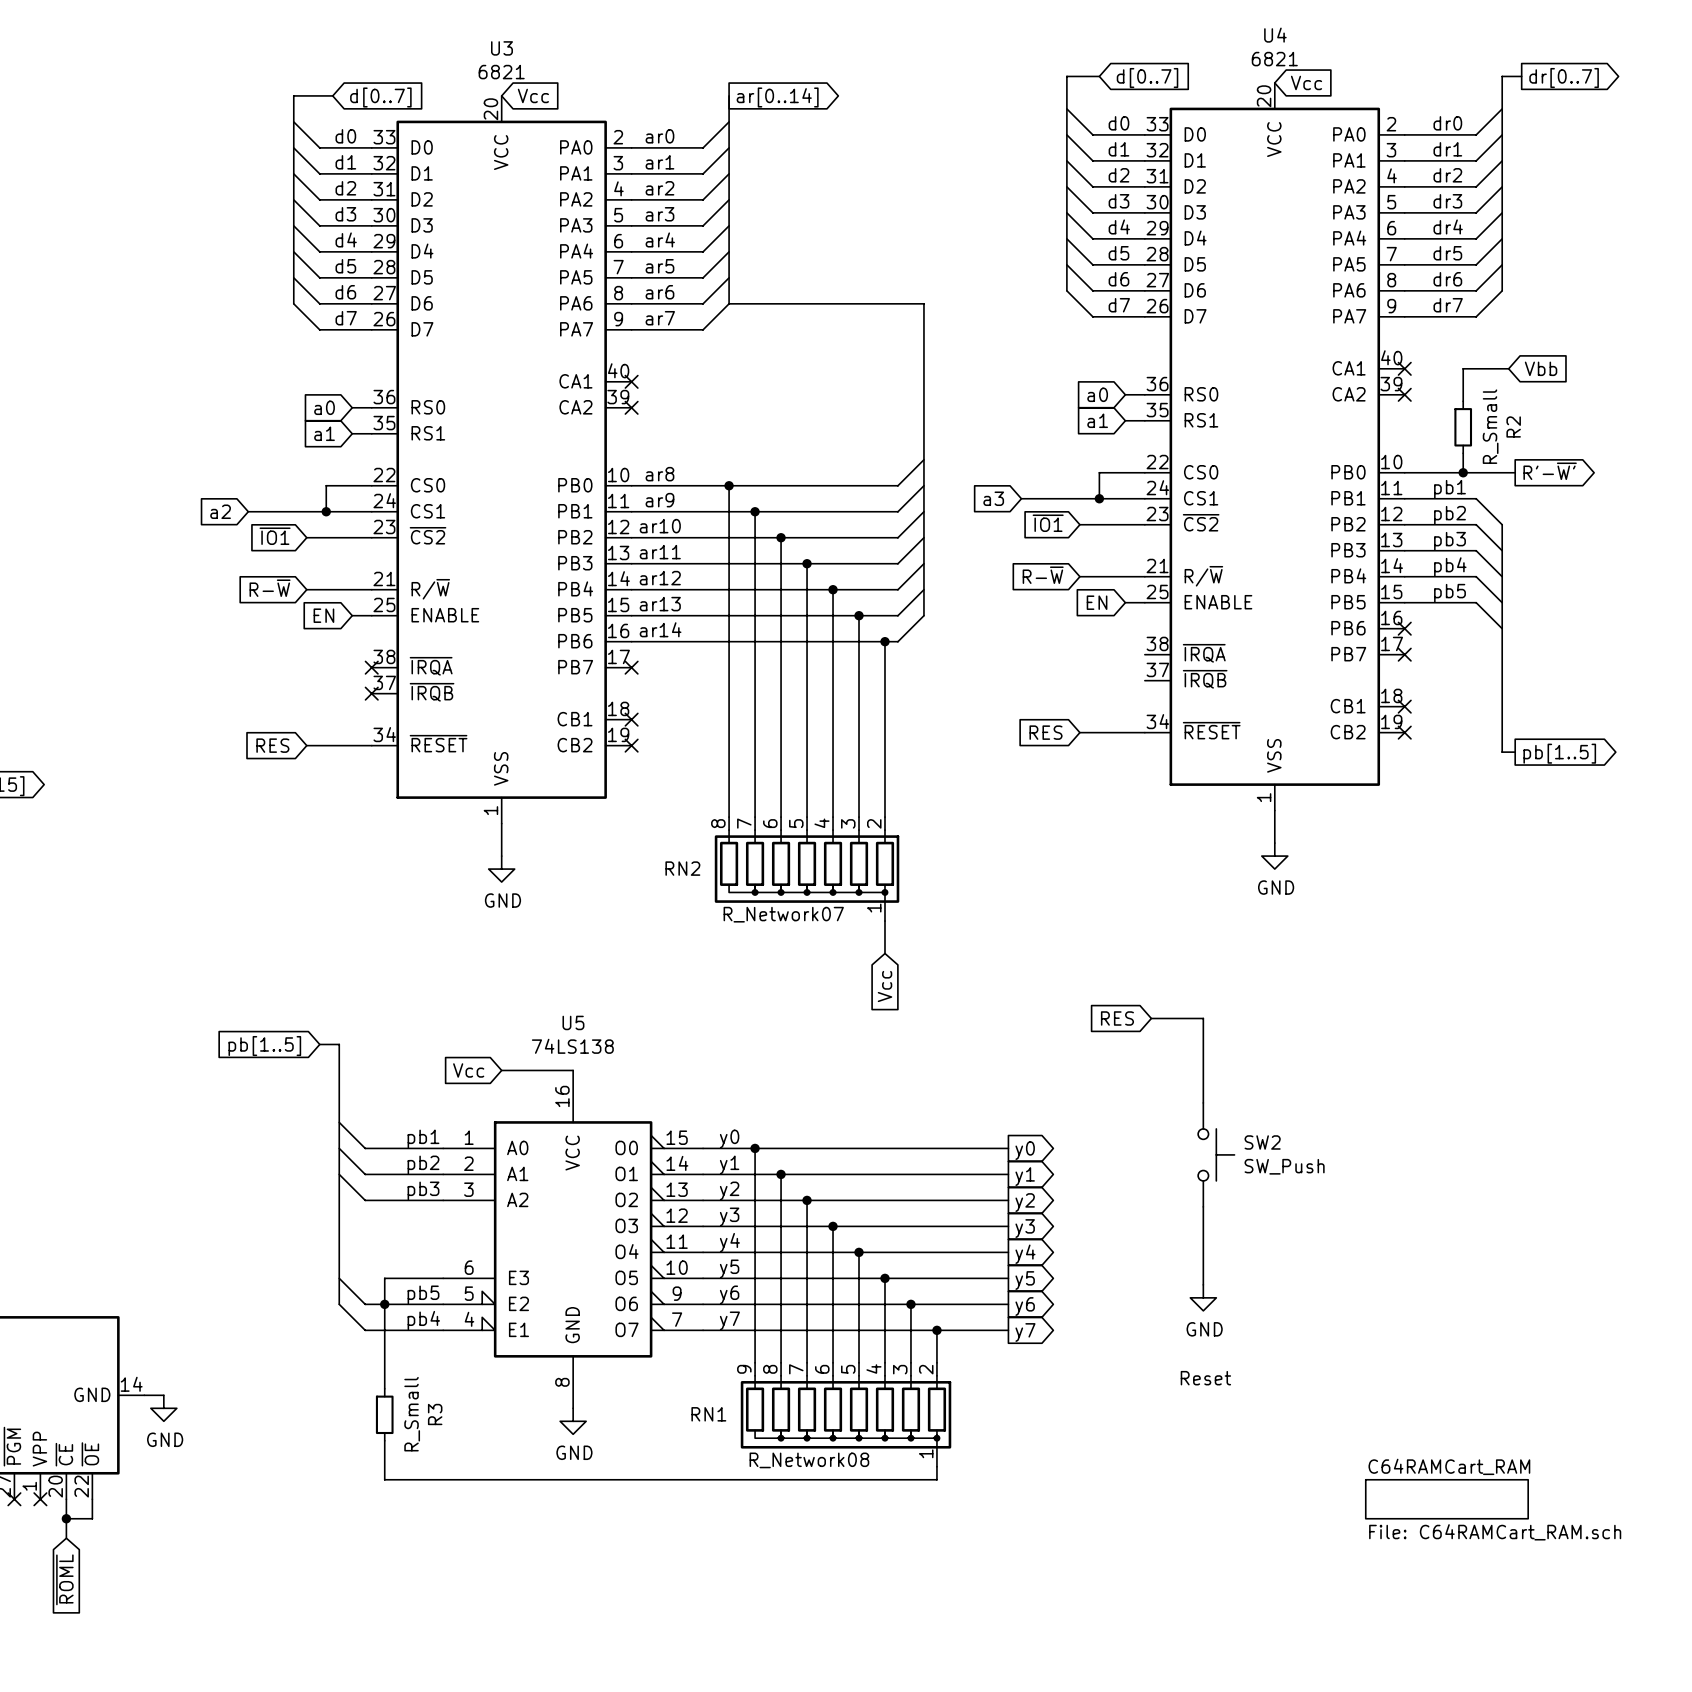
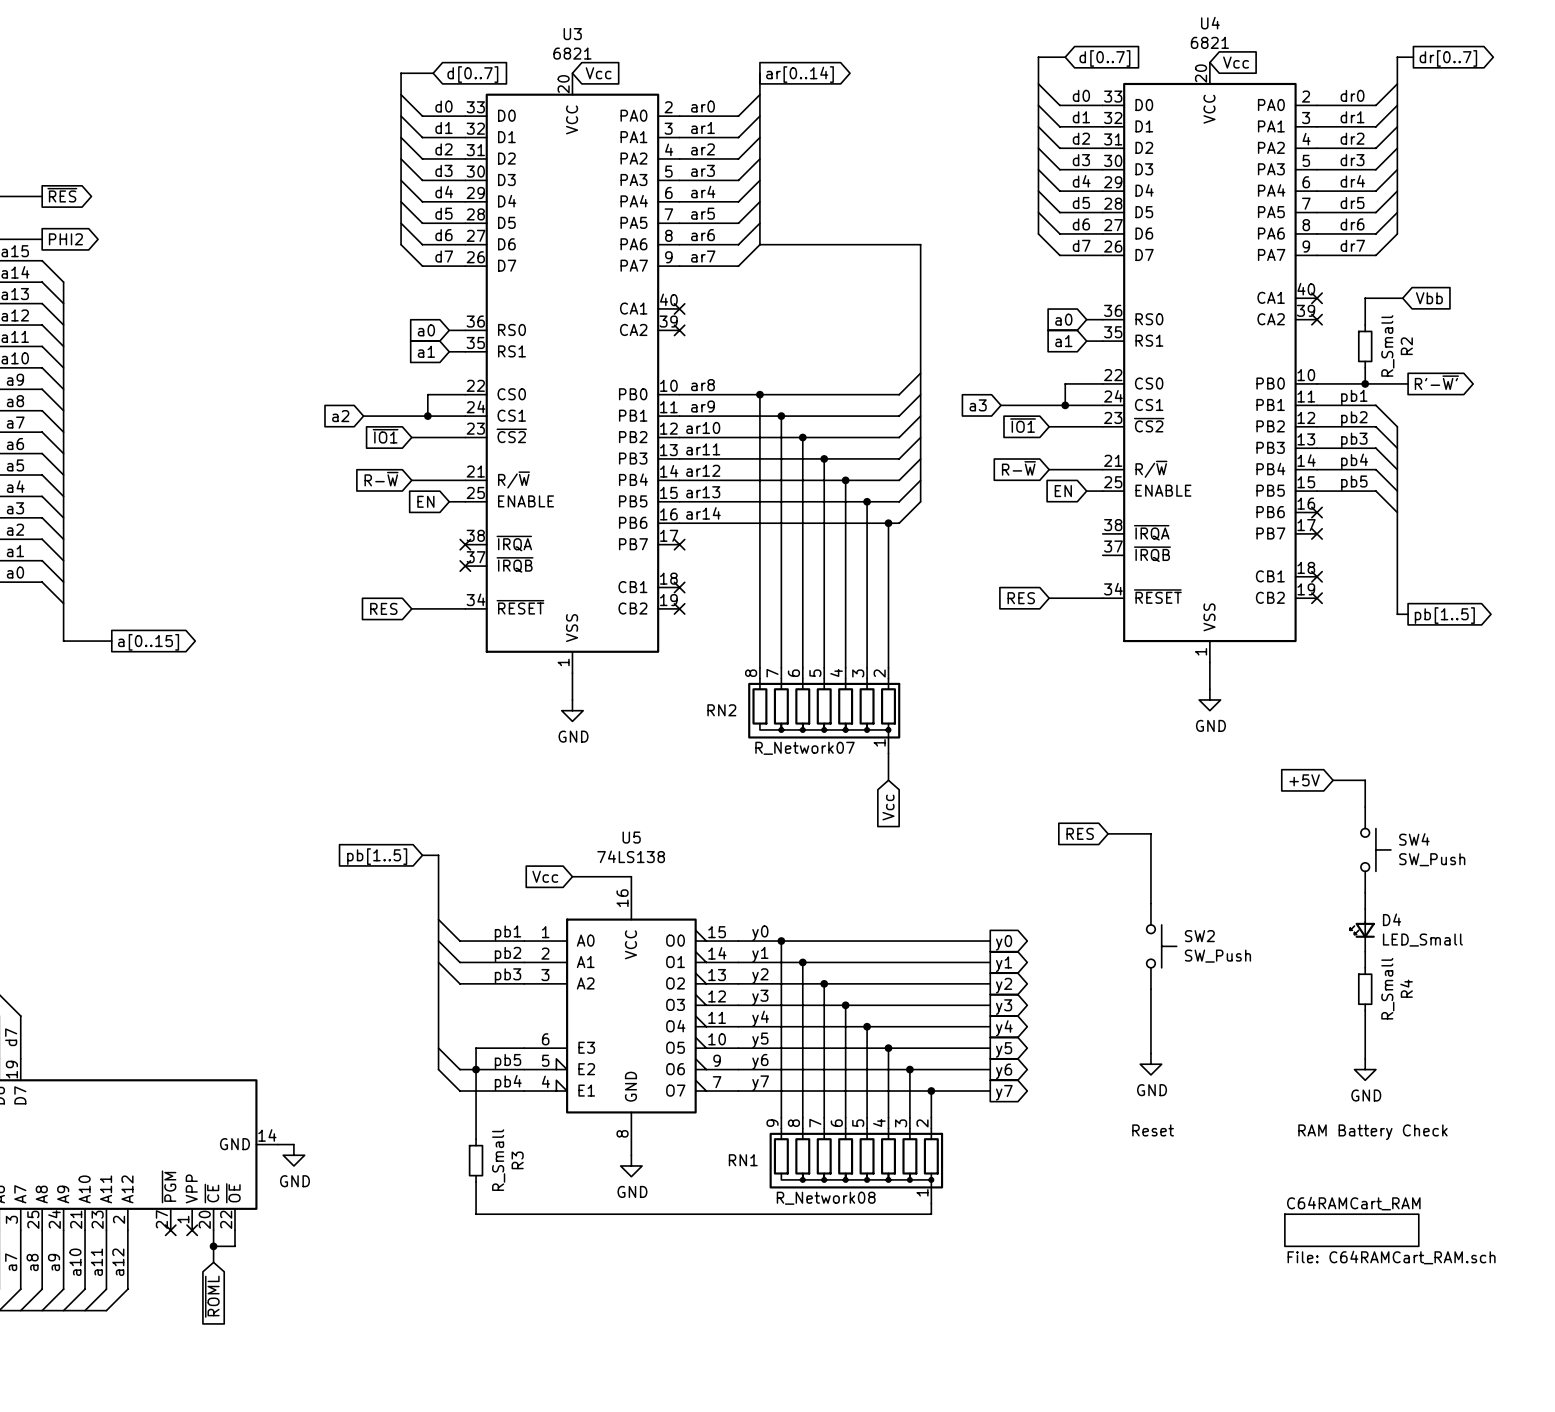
global label: none -> +5V (1304, 780)
wire: none -> (1333, 780) (1365, 780) (1365, 807)
SW4: none -> SW_Push (1375, 849)
wire: none -> (1365, 892) (1365, 908)
D4: none -> LED_Small (1362, 930)
wire: none -> (1365, 951) (1365, 967)
R4: none -> R_Small (1365, 989)
wire: none -> (1365, 1010) (1365, 1058)
power symbol: none -> GND (1365, 1069)
text: none -> RAM Battery Check (1372, 1132)

